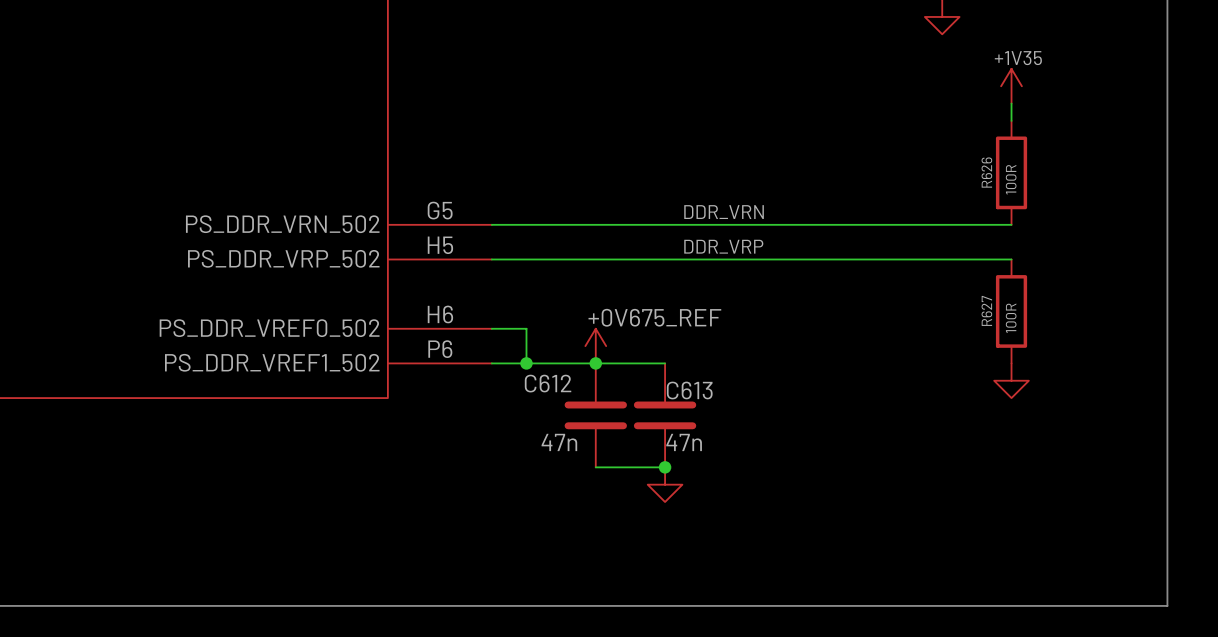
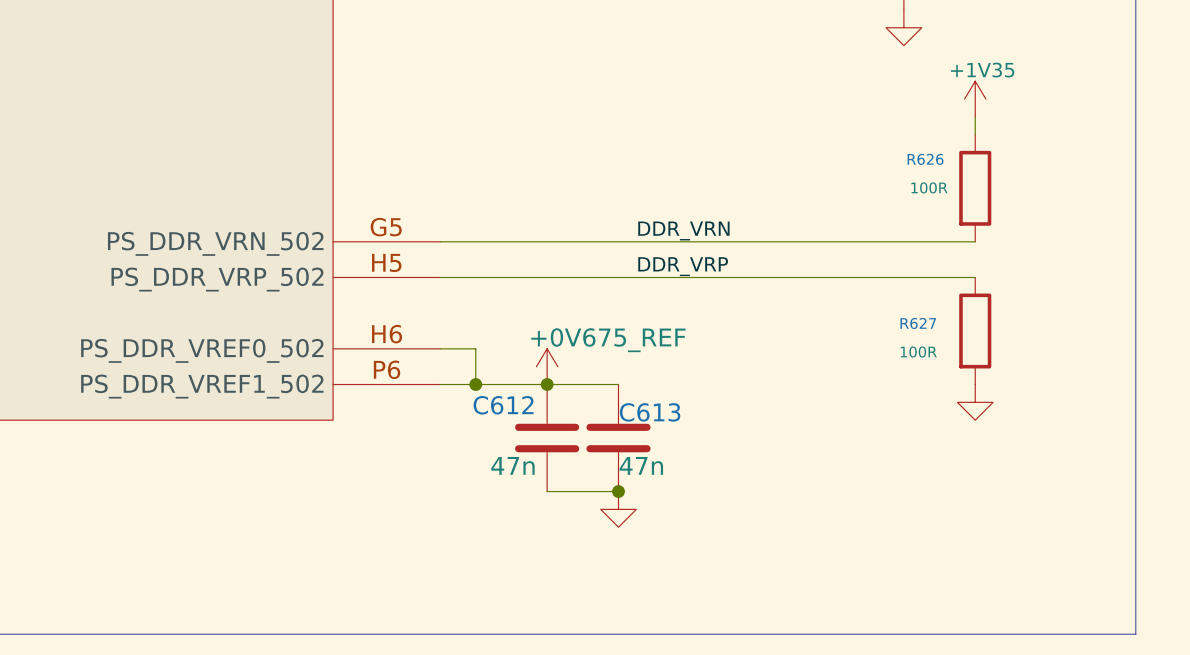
R626 name rotation: 0° (986, 172) -> 90° clockwise (925, 159)
R626 value rotation: 0° (1011, 179) -> 90° clockwise (929, 187)
R627 name rotation: 0° (986, 310) -> 90° clockwise (918, 323)
R627 value rotation: 0° (1011, 318) -> 90° clockwise (918, 352)
R627 value position: 100R (1011, 318) -> 100R (918, 352)

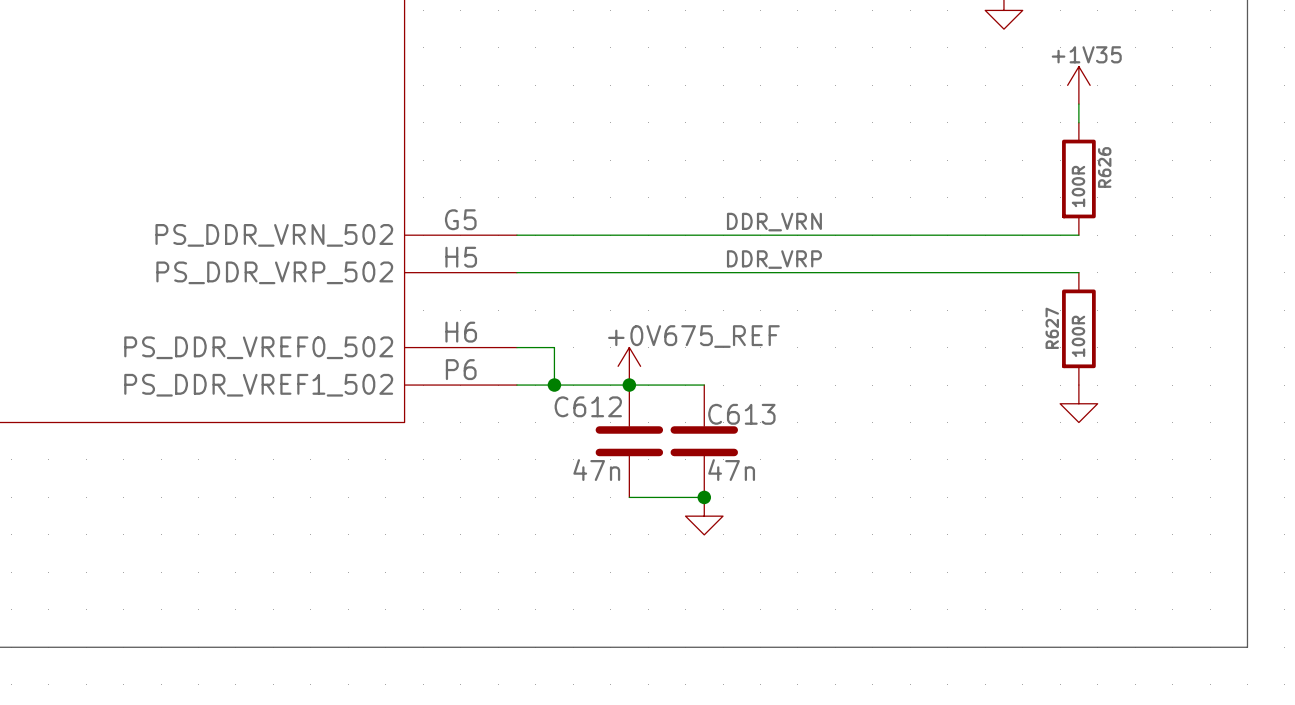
R626 name rotation: 0° (925, 159) -> 90° counterclockwise (1104, 167)
R626 name position: R626 (925, 159) -> R626 (1104, 167)
R626 value rotation: 0° (929, 187) -> 90° counterclockwise (1078, 186)
R627 name rotation: 0° (918, 323) -> 90° counterclockwise (1052, 328)
R627 value rotation: 0° (918, 352) -> 90° counterclockwise (1078, 336)
R627 value position: 100R (918, 352) -> 100R (1078, 336)

